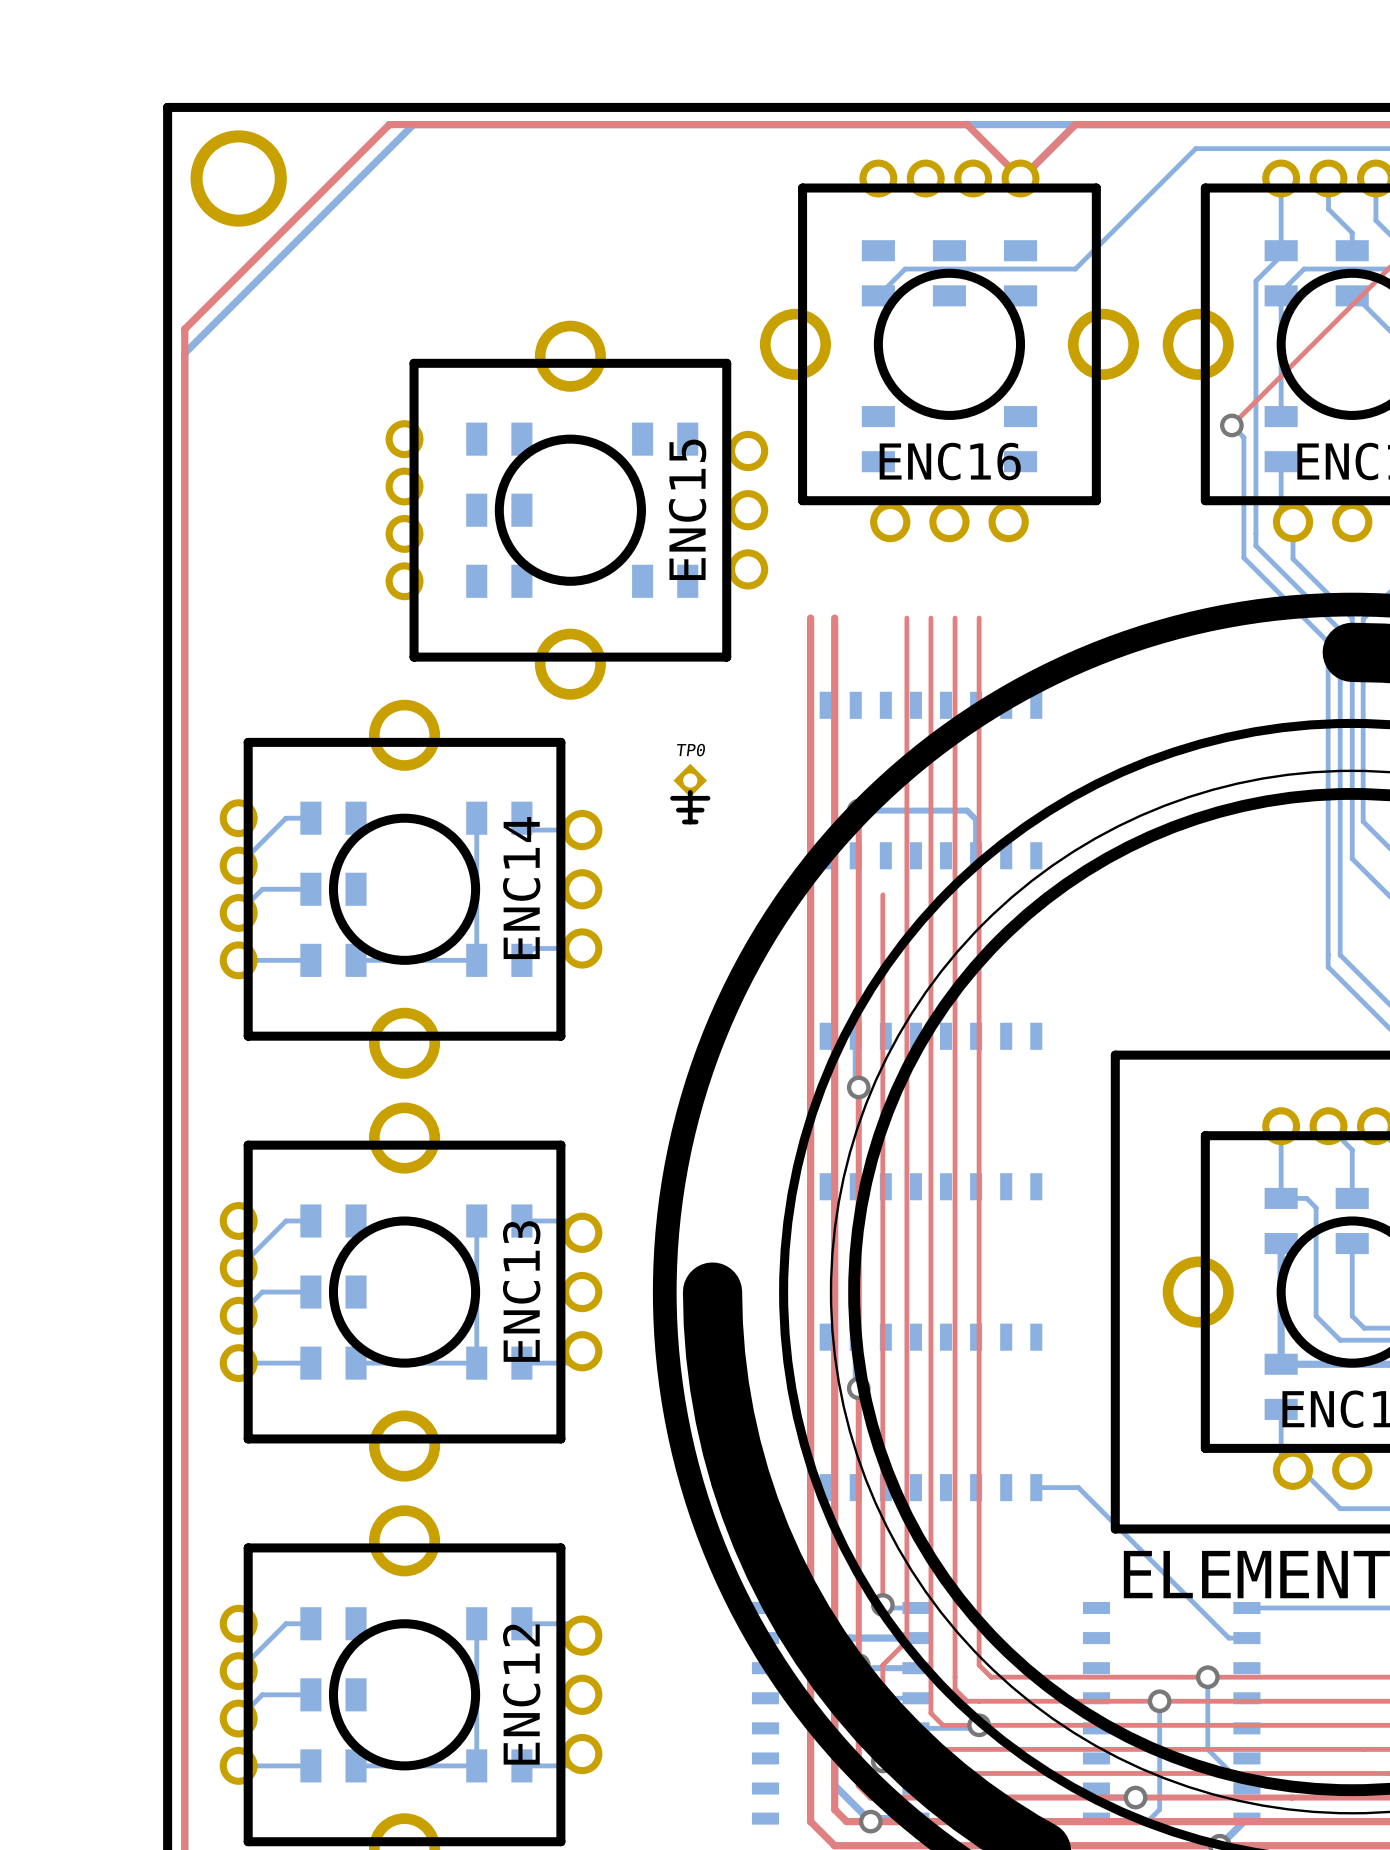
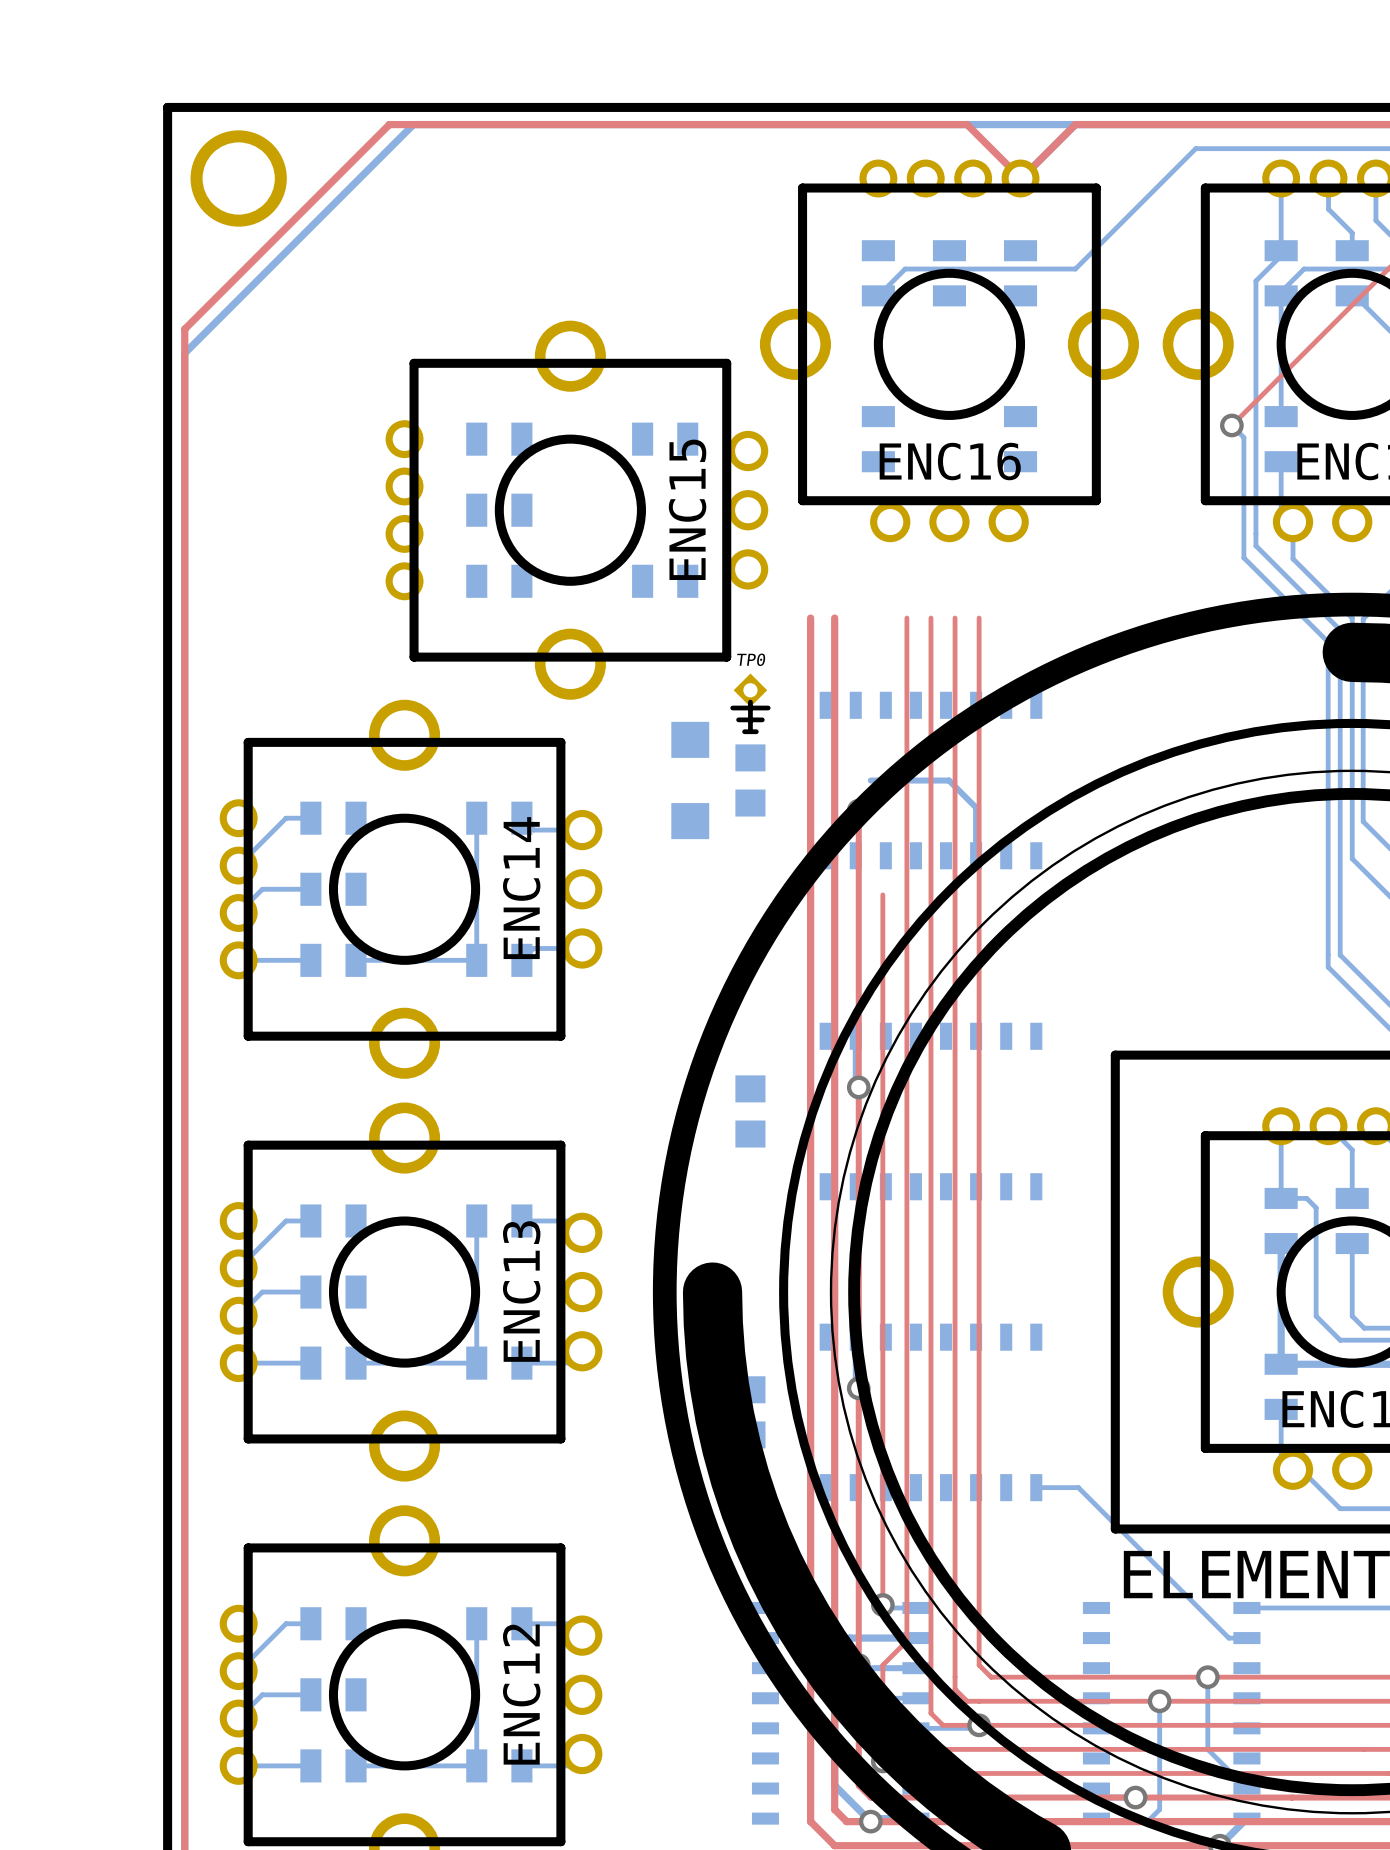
part: none -> (690, 780)
part: none -> (750, 780)
TP0 position: (690, 794) -> (750, 703)
bottom track: (858, 810) (967, 810) (976, 819) -> (870, 780) (949, 780) (976, 807) (976, 819)
part: none -> (750, 1111)
part: none -> (750, 1412)

